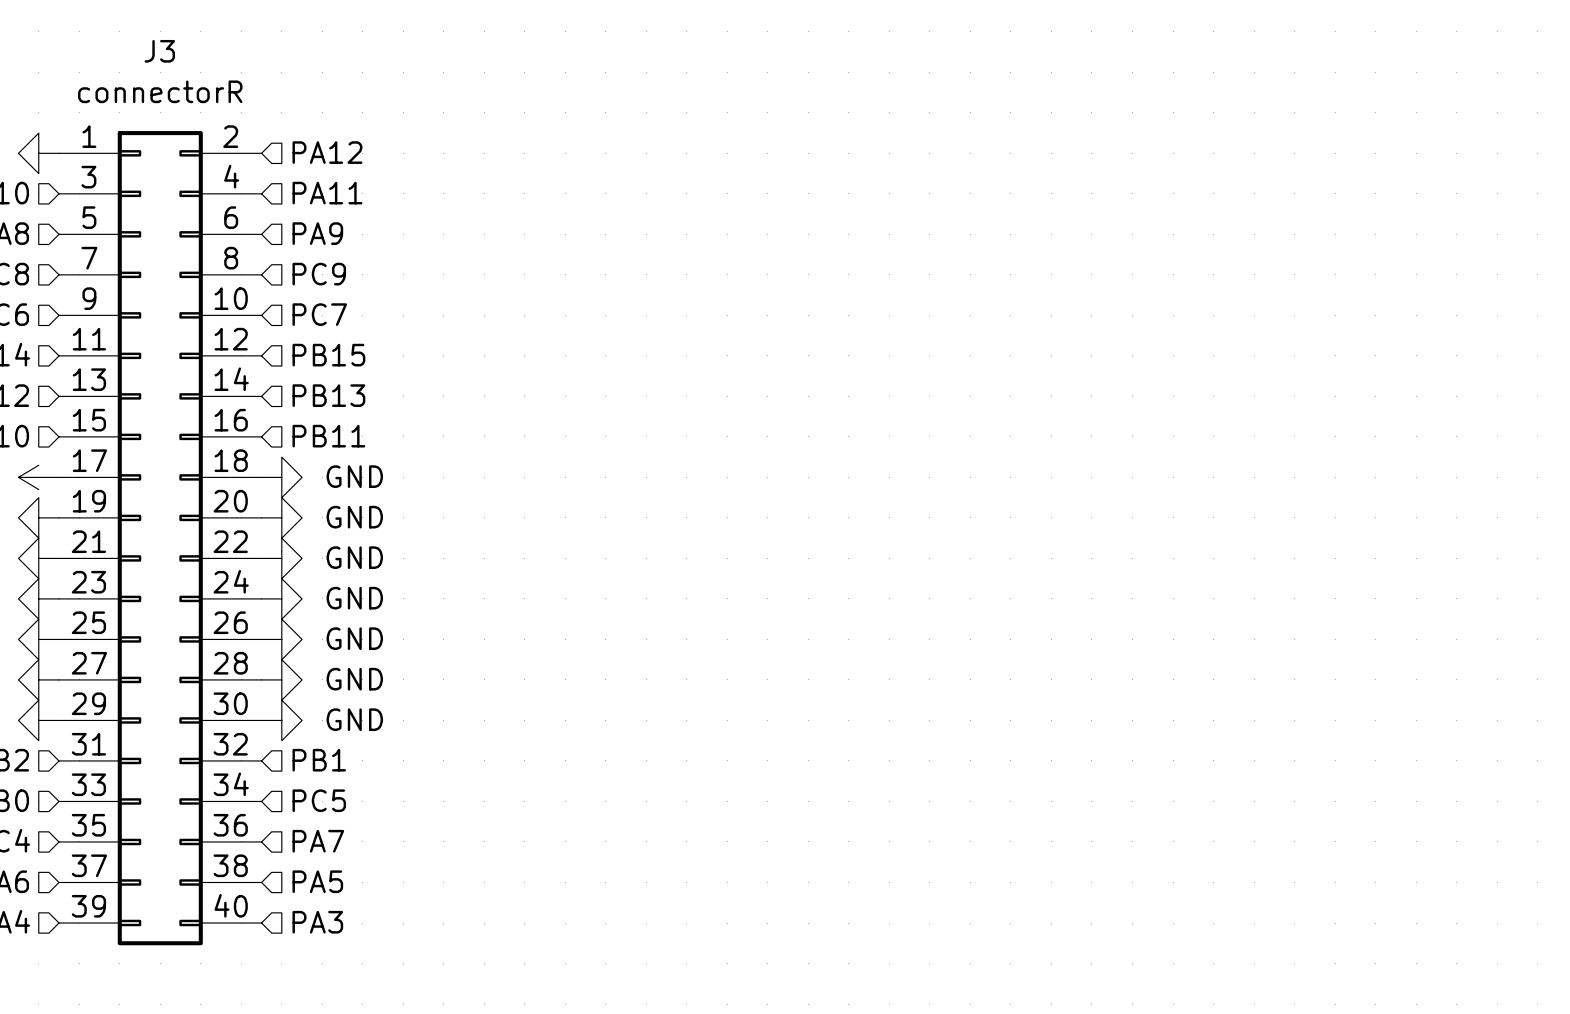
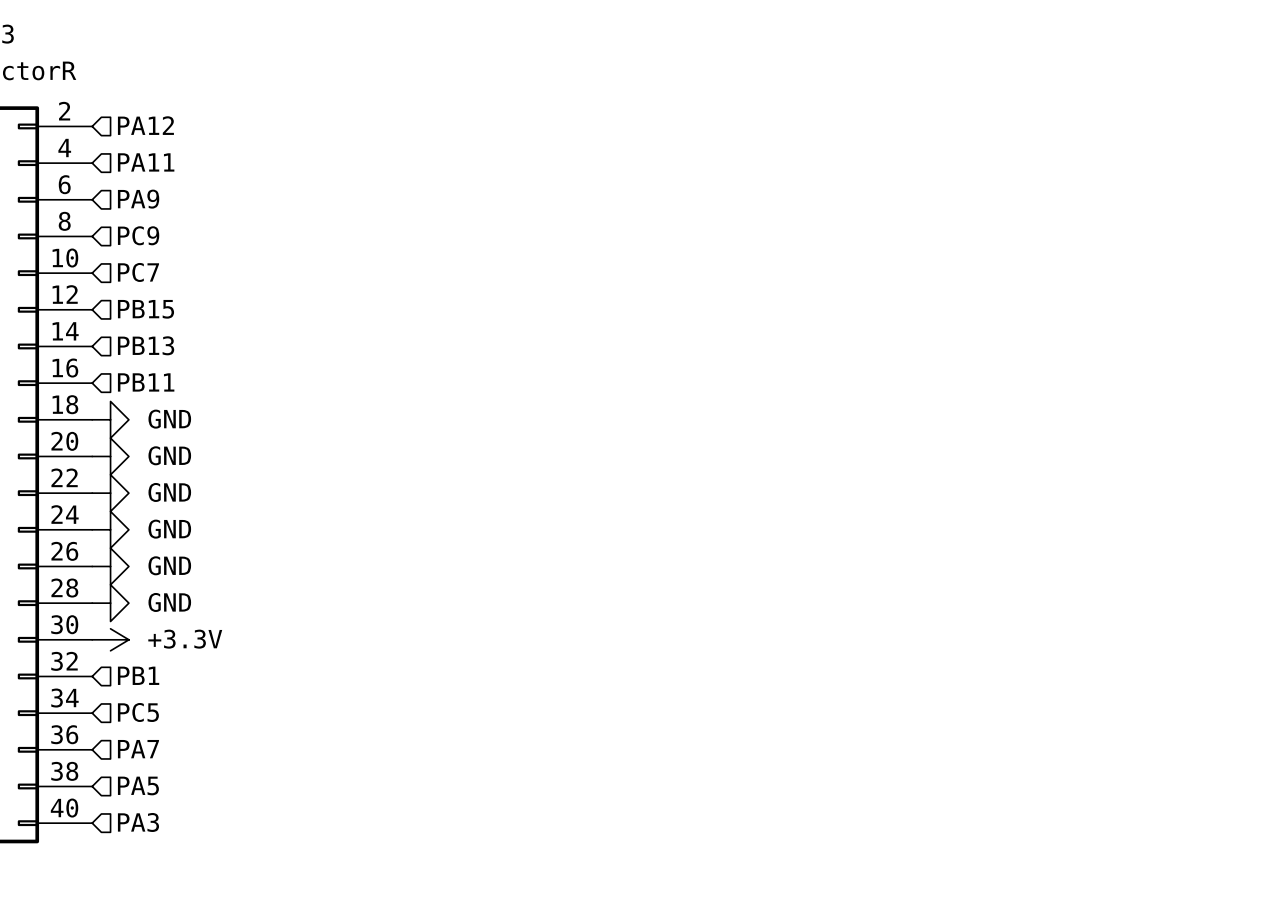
power symbol: GND (281, 720) -> +3.3V (110, 639)

